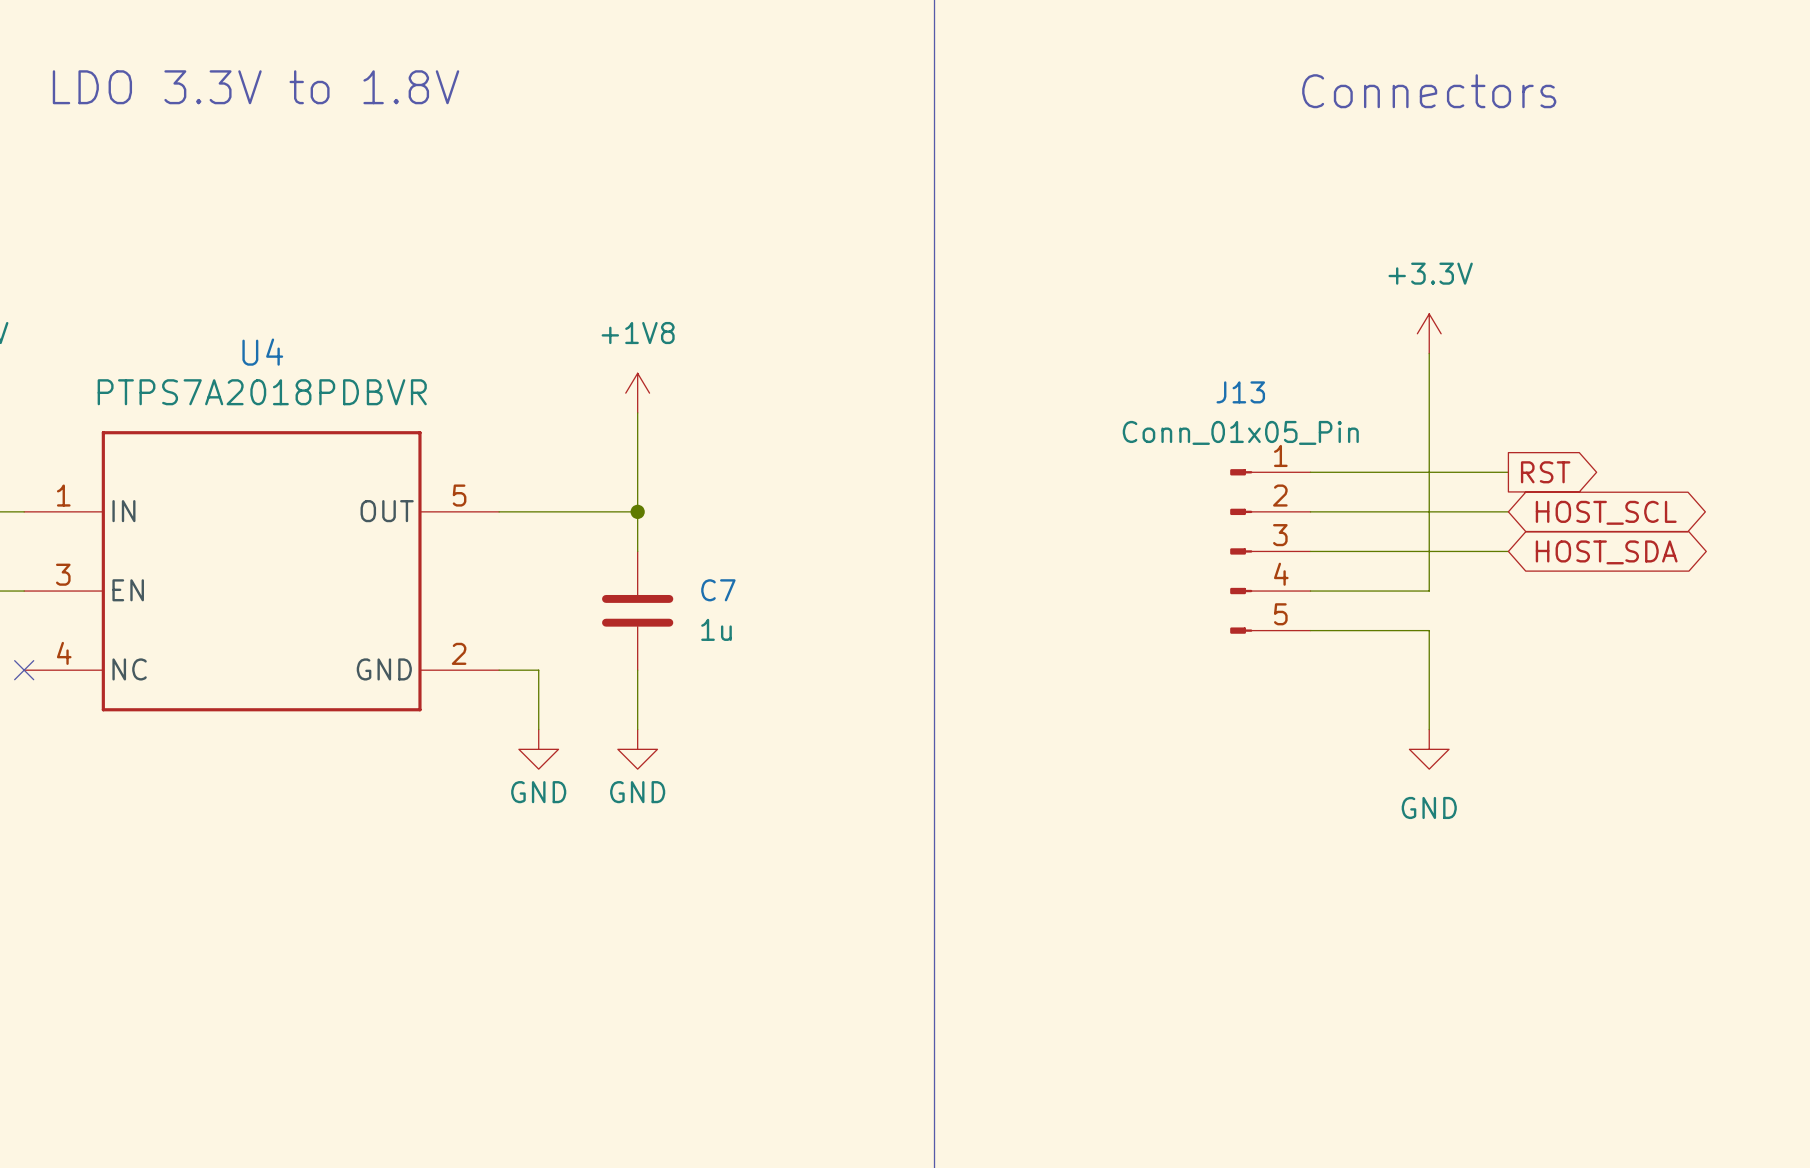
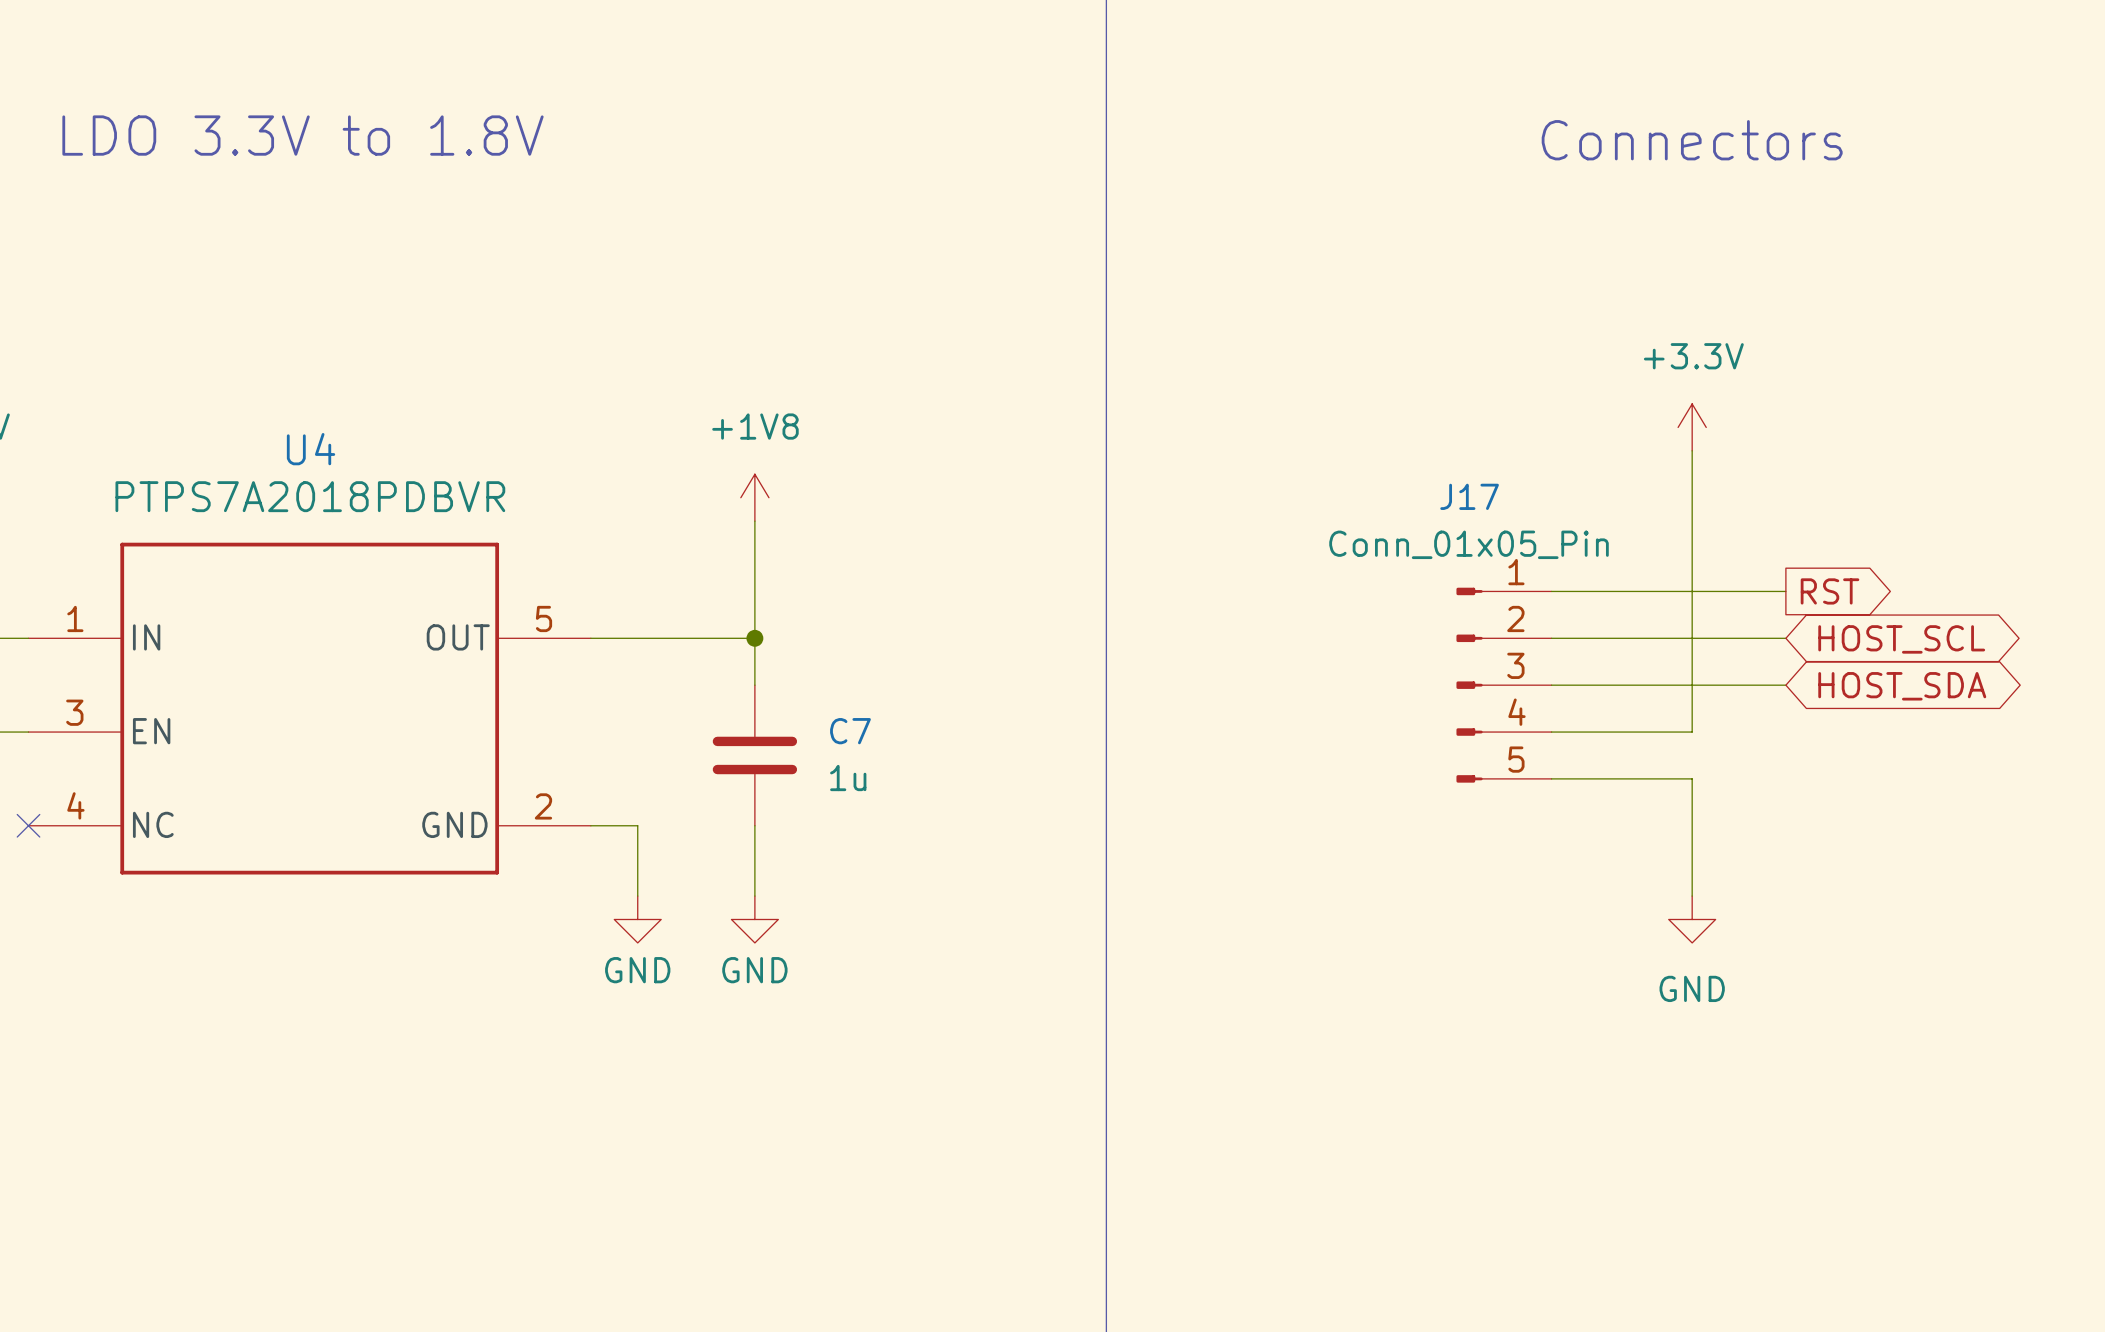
J13 name: J13 (1240, 392) -> J17 (1469, 496)

